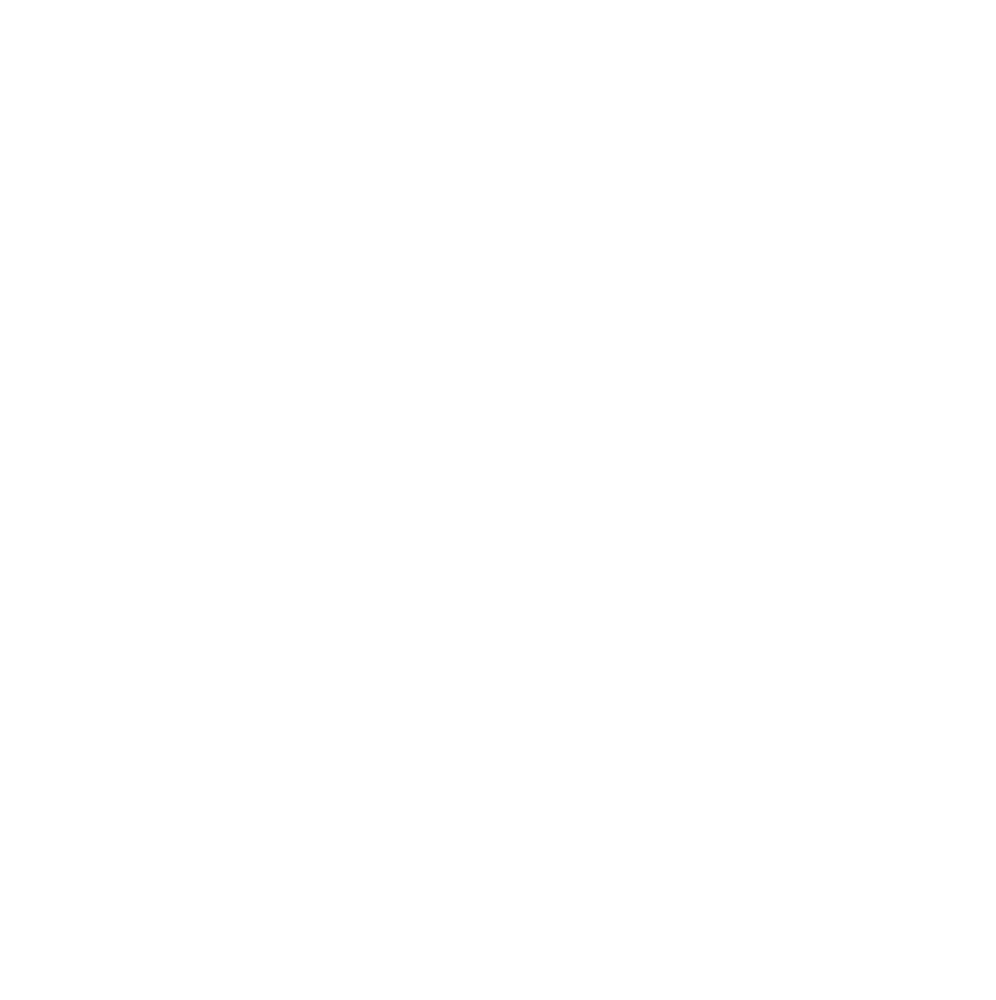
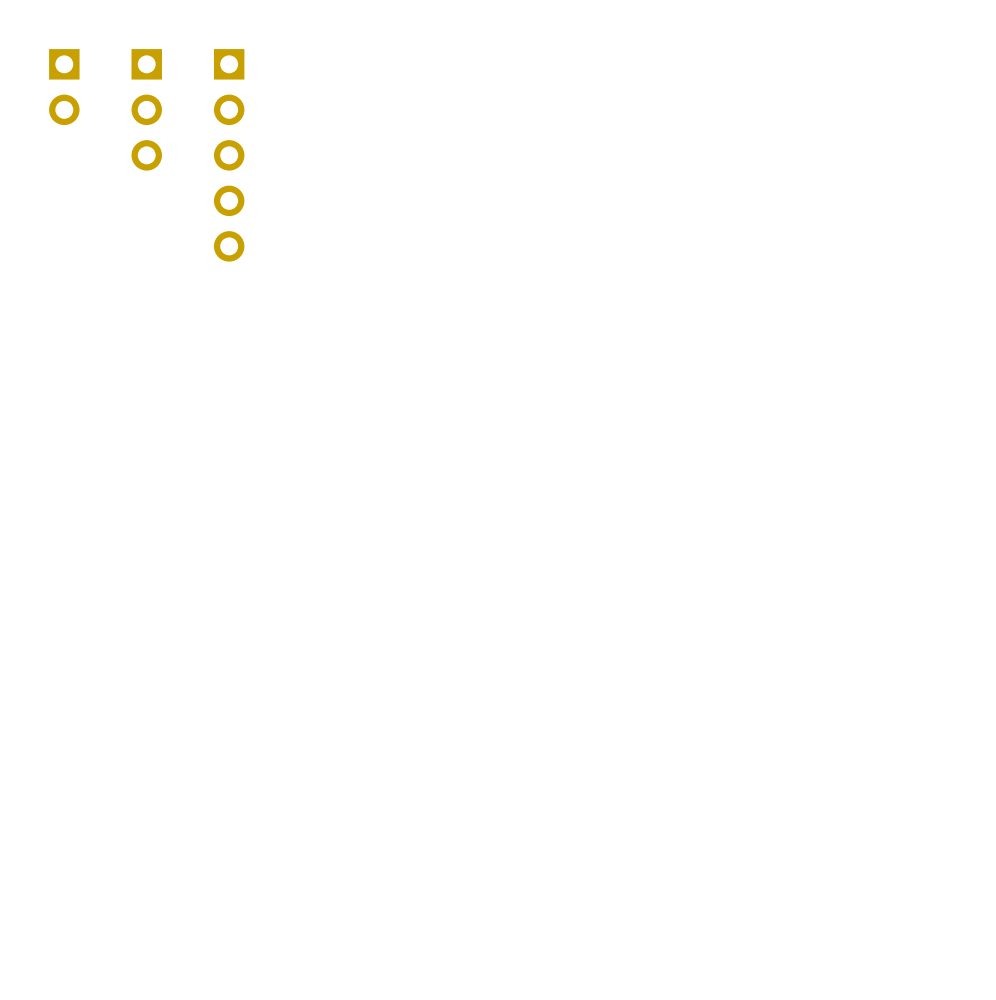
part: none -> (64, 87)
part: none -> (146, 109)
part: none -> (229, 155)

